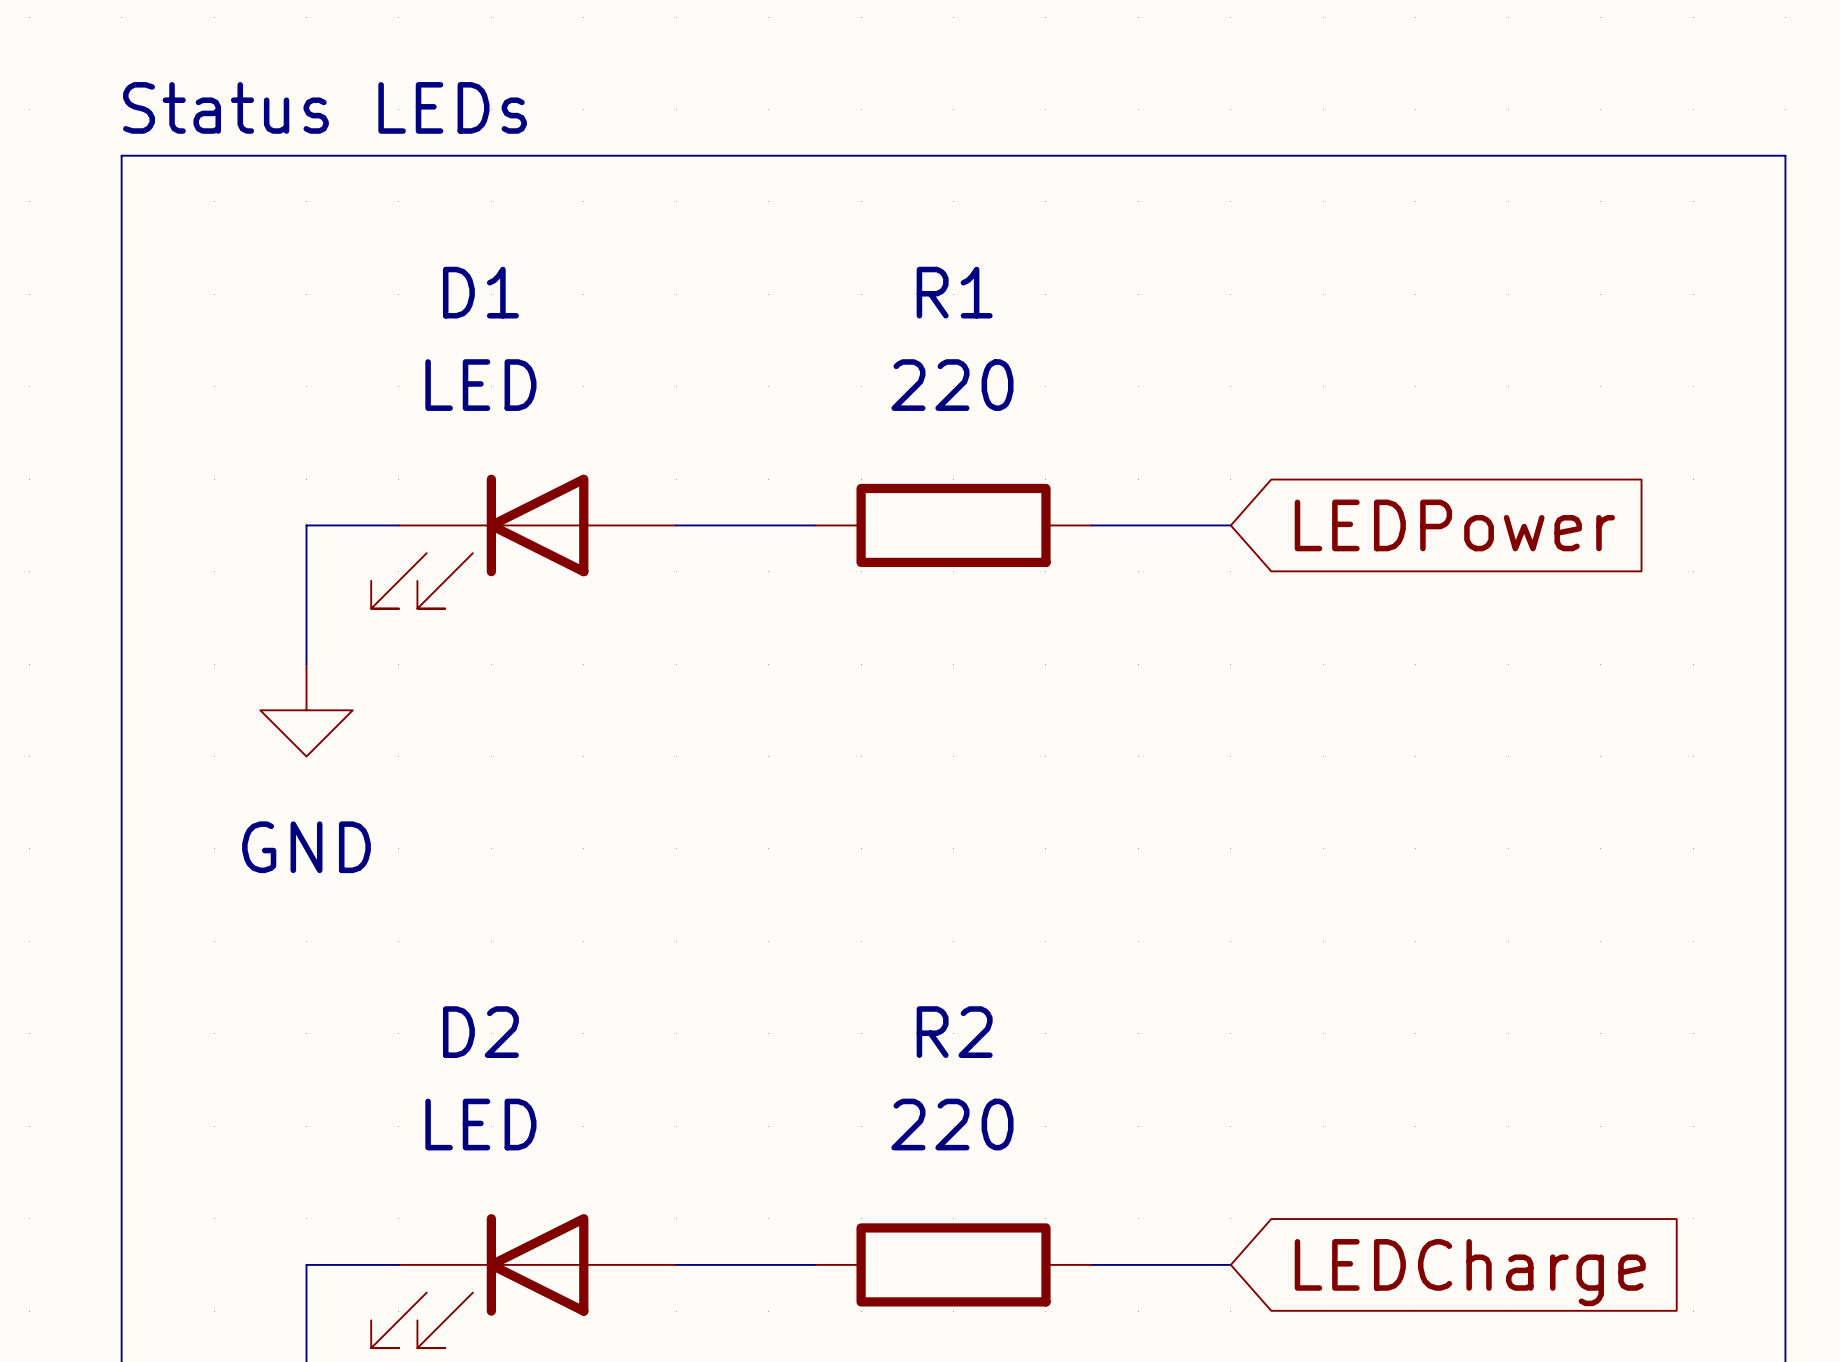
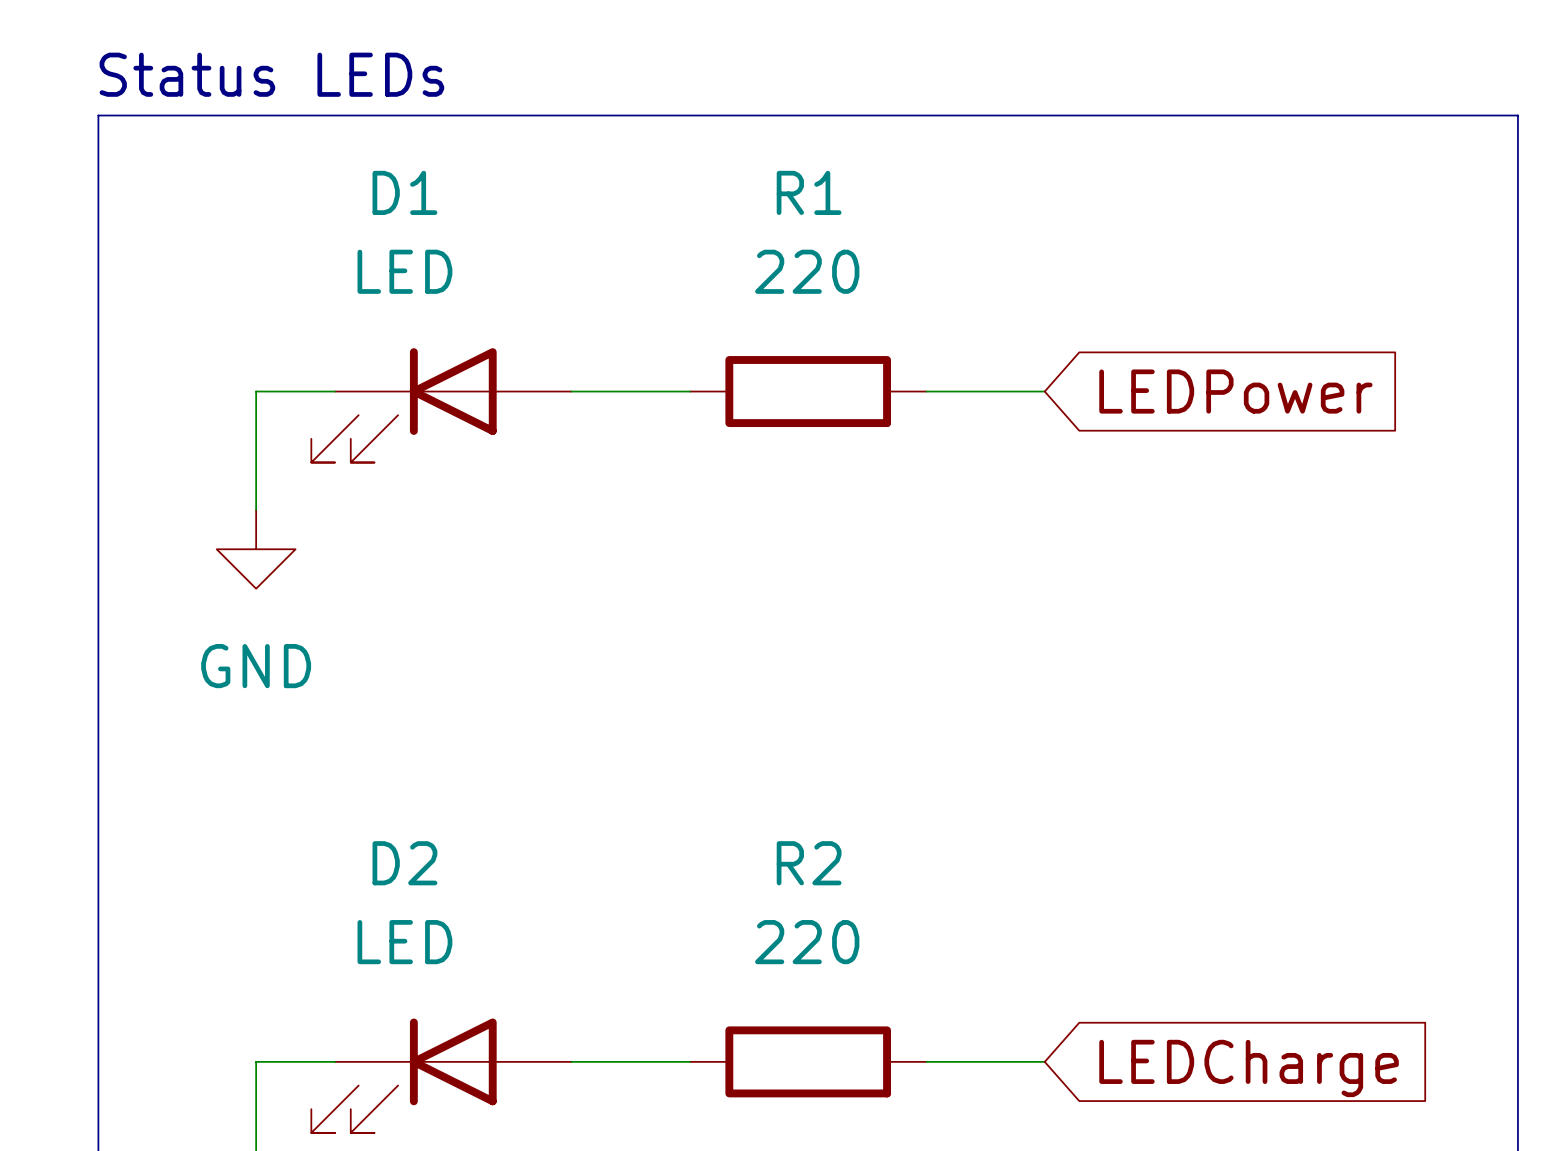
wire: (306, 525) (398, 525) -> (256, 430) (256, 391) (334, 391)
wire: (676, 525) (814, 525) -> (571, 391) (689, 391)
R1 position: (953, 525) -> (808, 391)
wire: (1092, 525) (1230, 525) -> (926, 391) (1044, 391)
global label position: LEDPower (1454, 525) -> LEDPower (1235, 391)
D1 position: (523, 541) -> (441, 405)
power symbol position: GND (306, 710) -> GND (256, 549)

